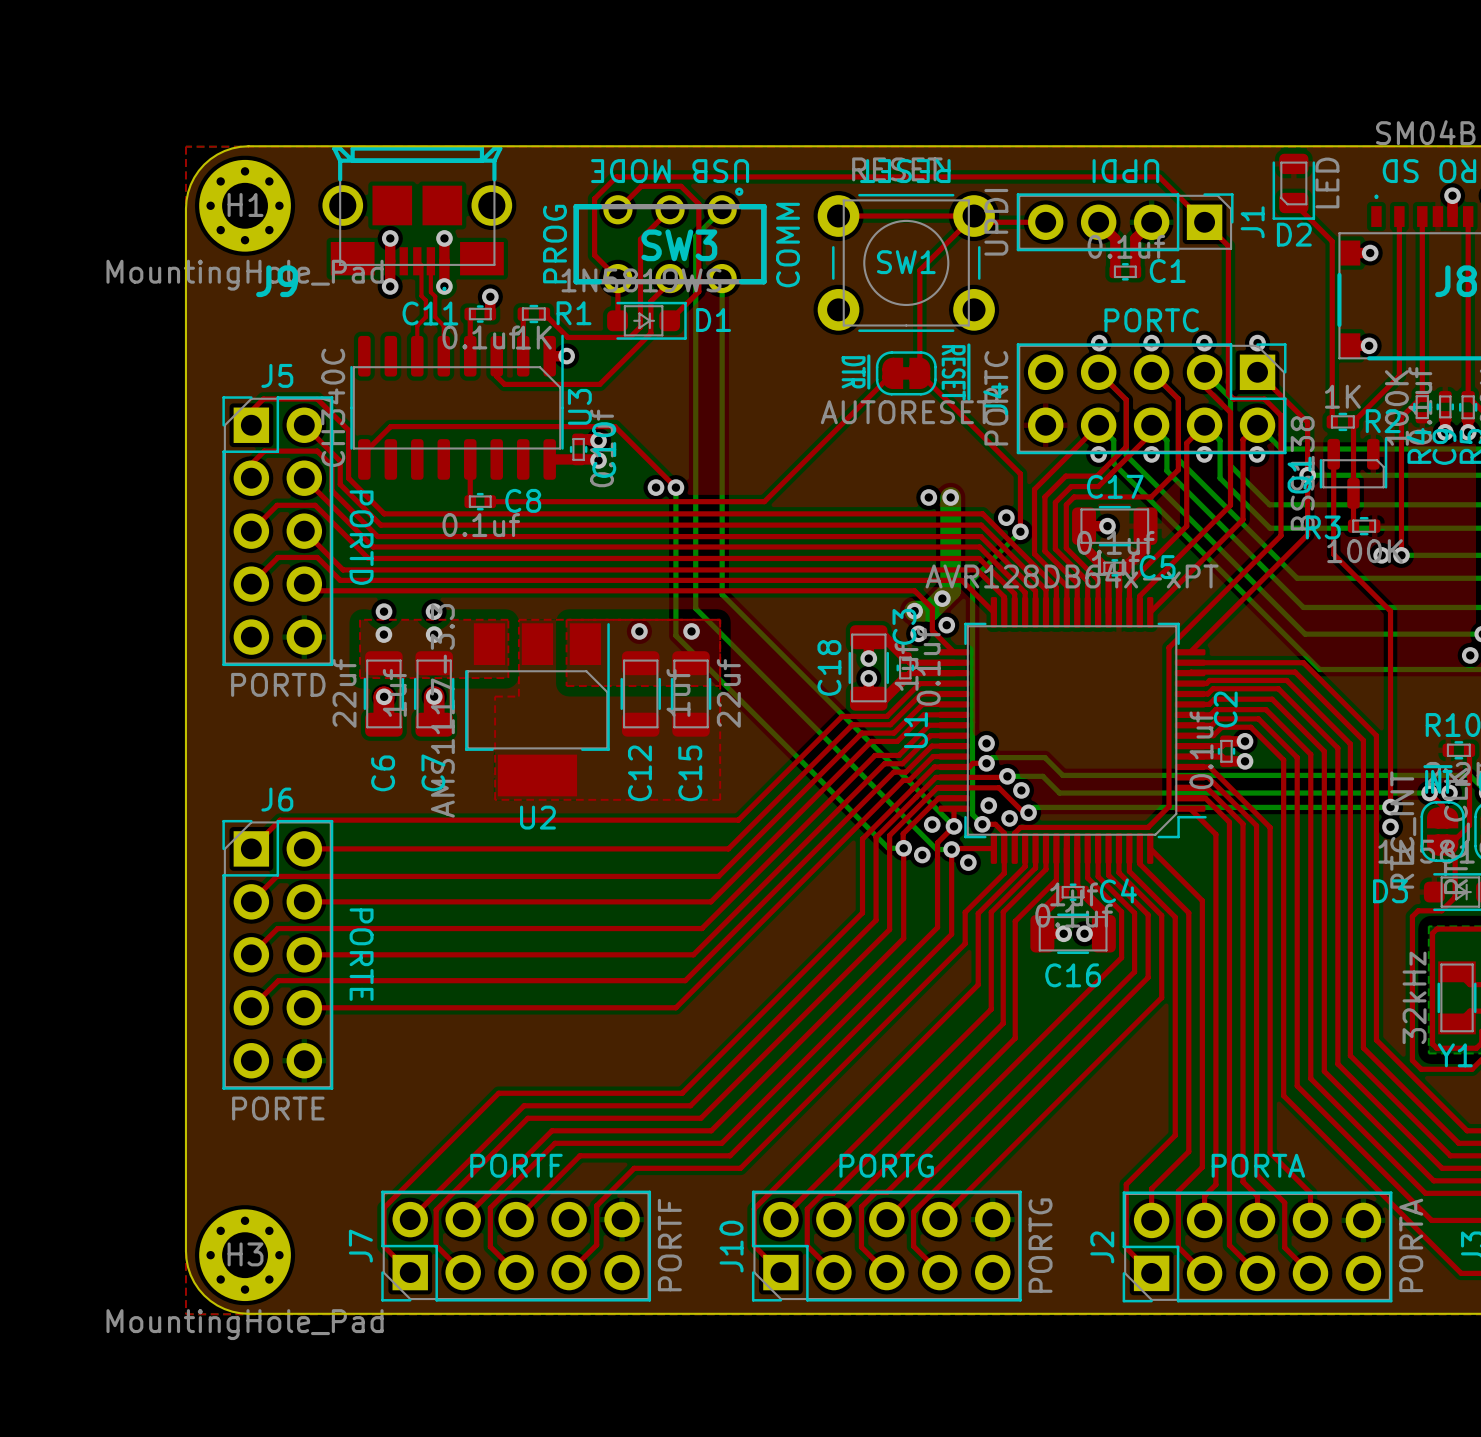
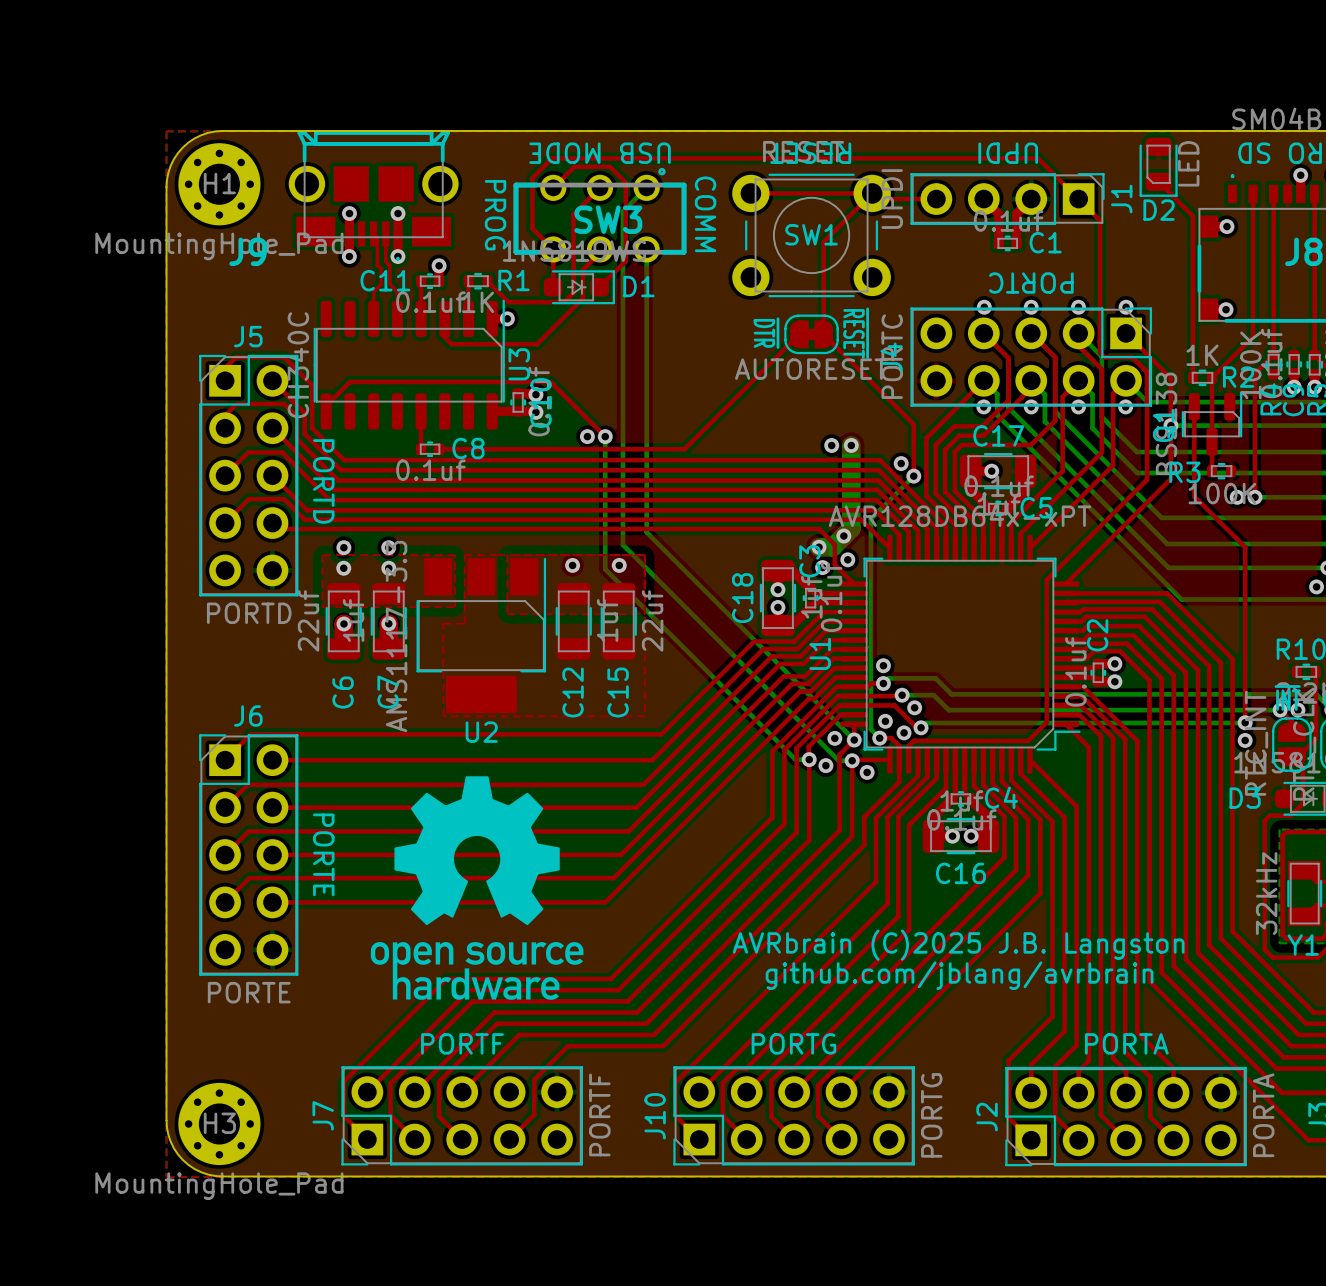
text rotation: 0° (555, 244) -> 180° (495, 215)
text rotation: 0° (788, 245) -> 180° (705, 214)
text rotation: 0° (1151, 320) -> 180° (1031, 283)
drawing: none -> [370, 776, 584, 1000]
text: none -> AVRbrain (C)2025 J.B. Langston (958, 945)
text: none -> github.com/jblang/avrbrain (959, 975)

